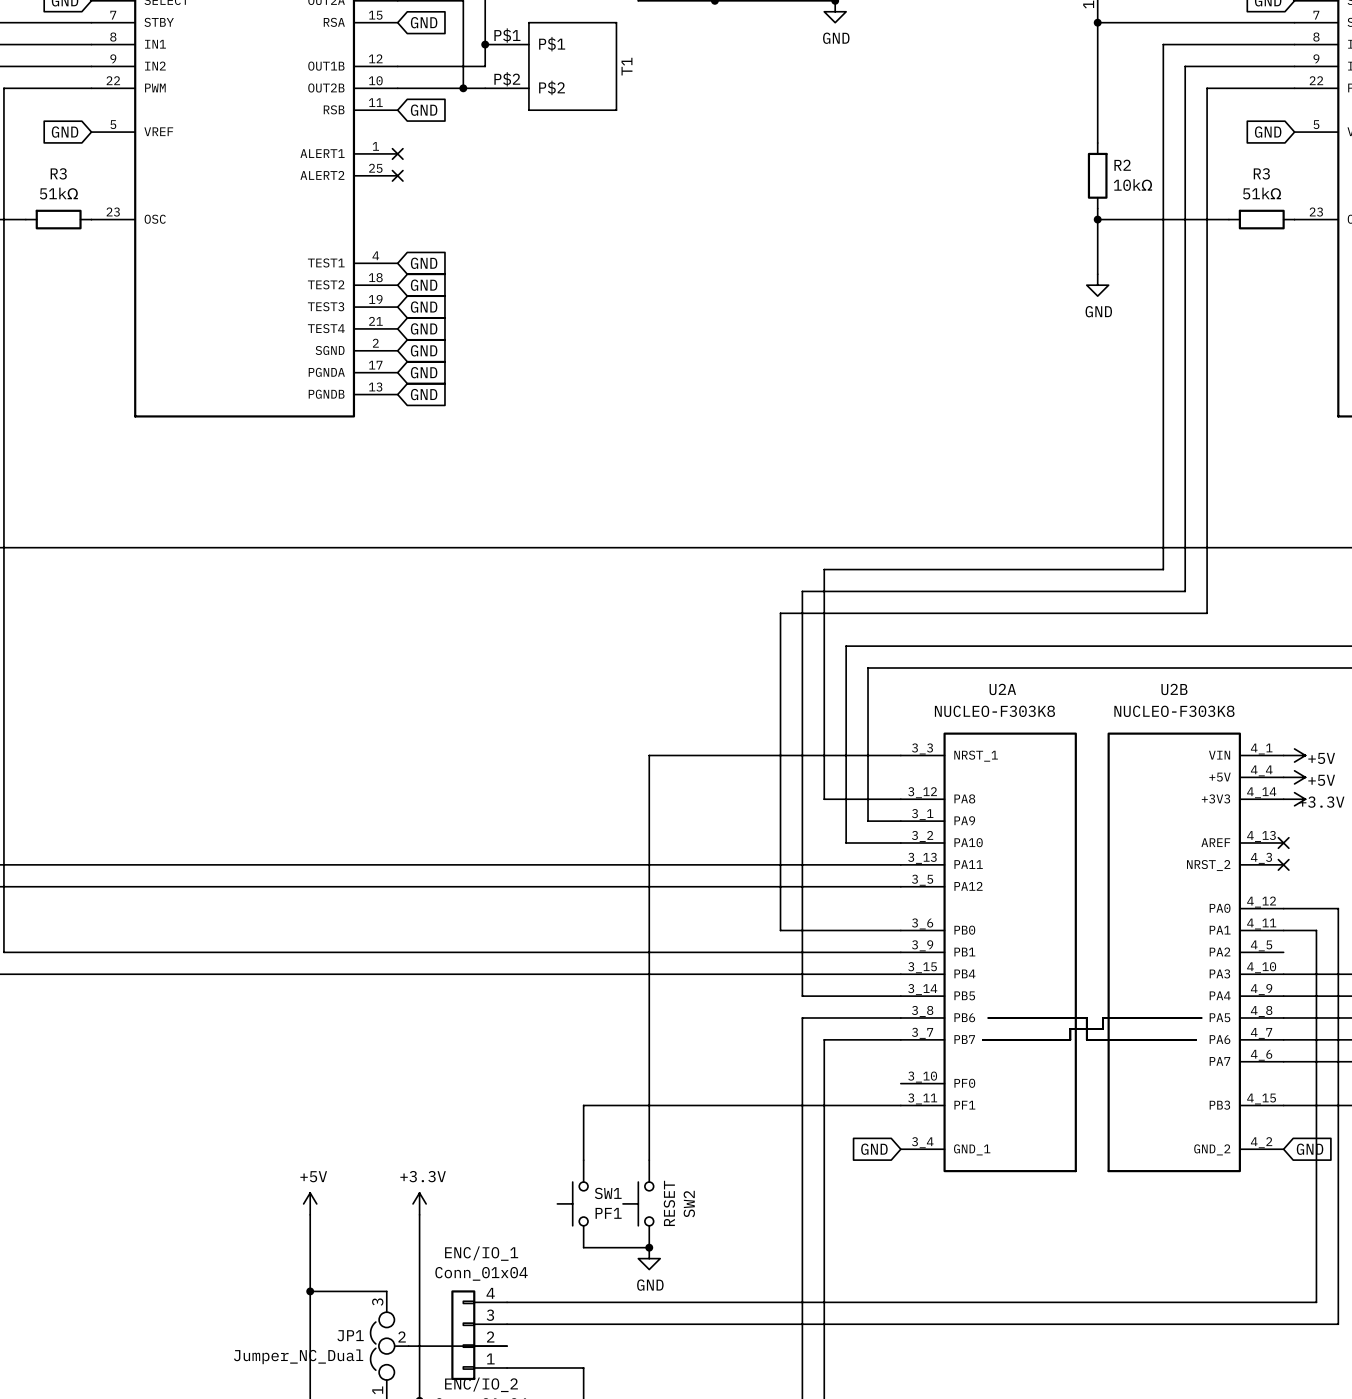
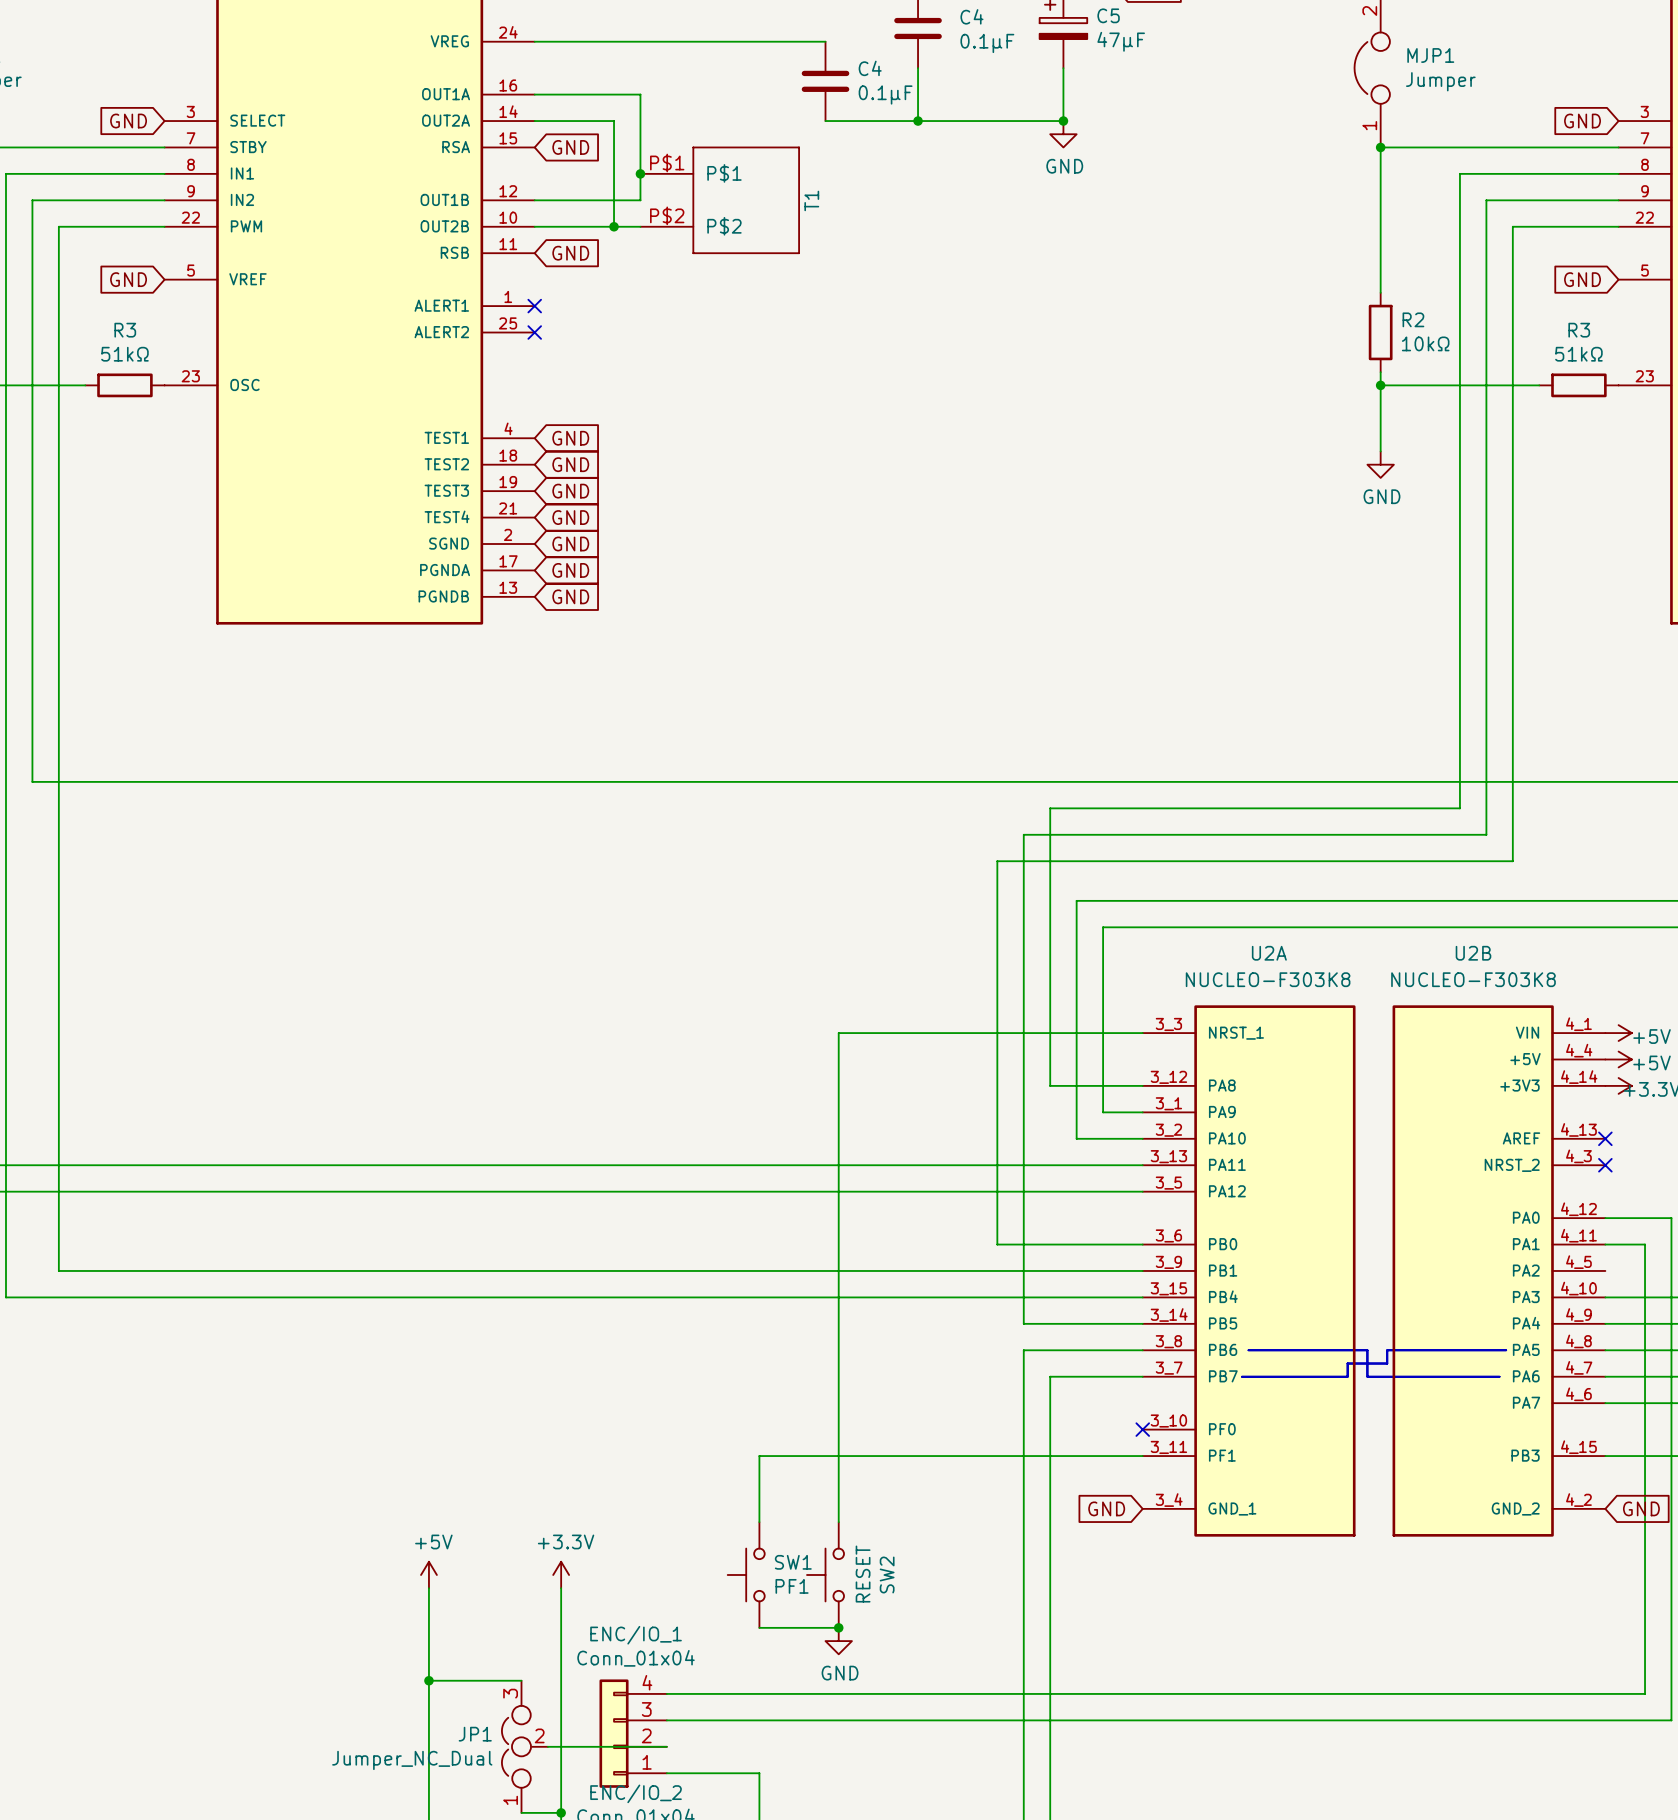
no-connect mark: none -> (1142, 1429)

